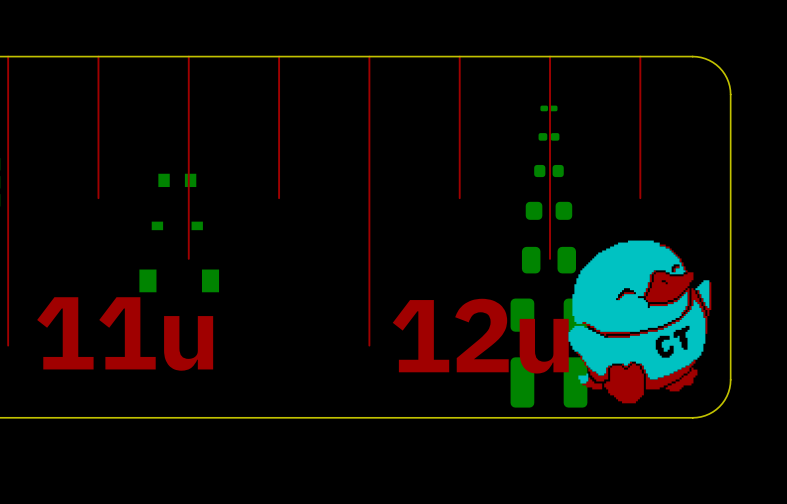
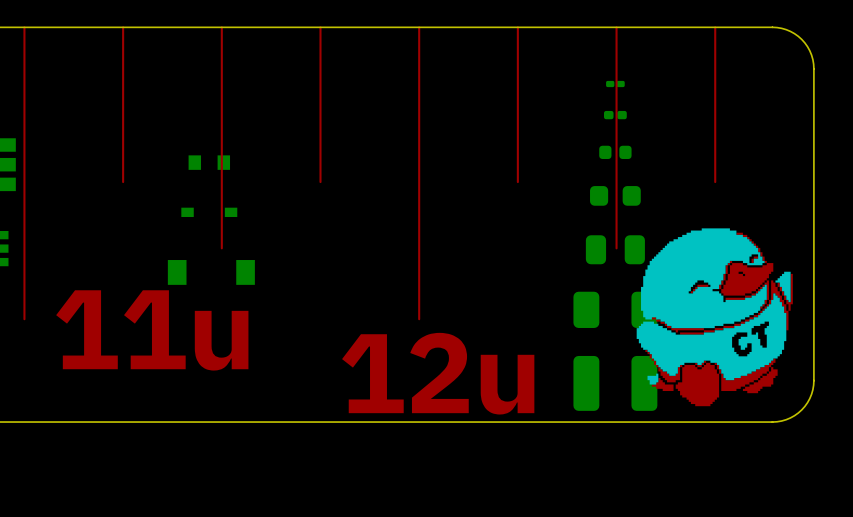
top track: (8, 323) (8, 345) -> none
top track: (369, 323) (369, 345) -> none
text position: 12u (480, 336) -> 12u (438, 373)

